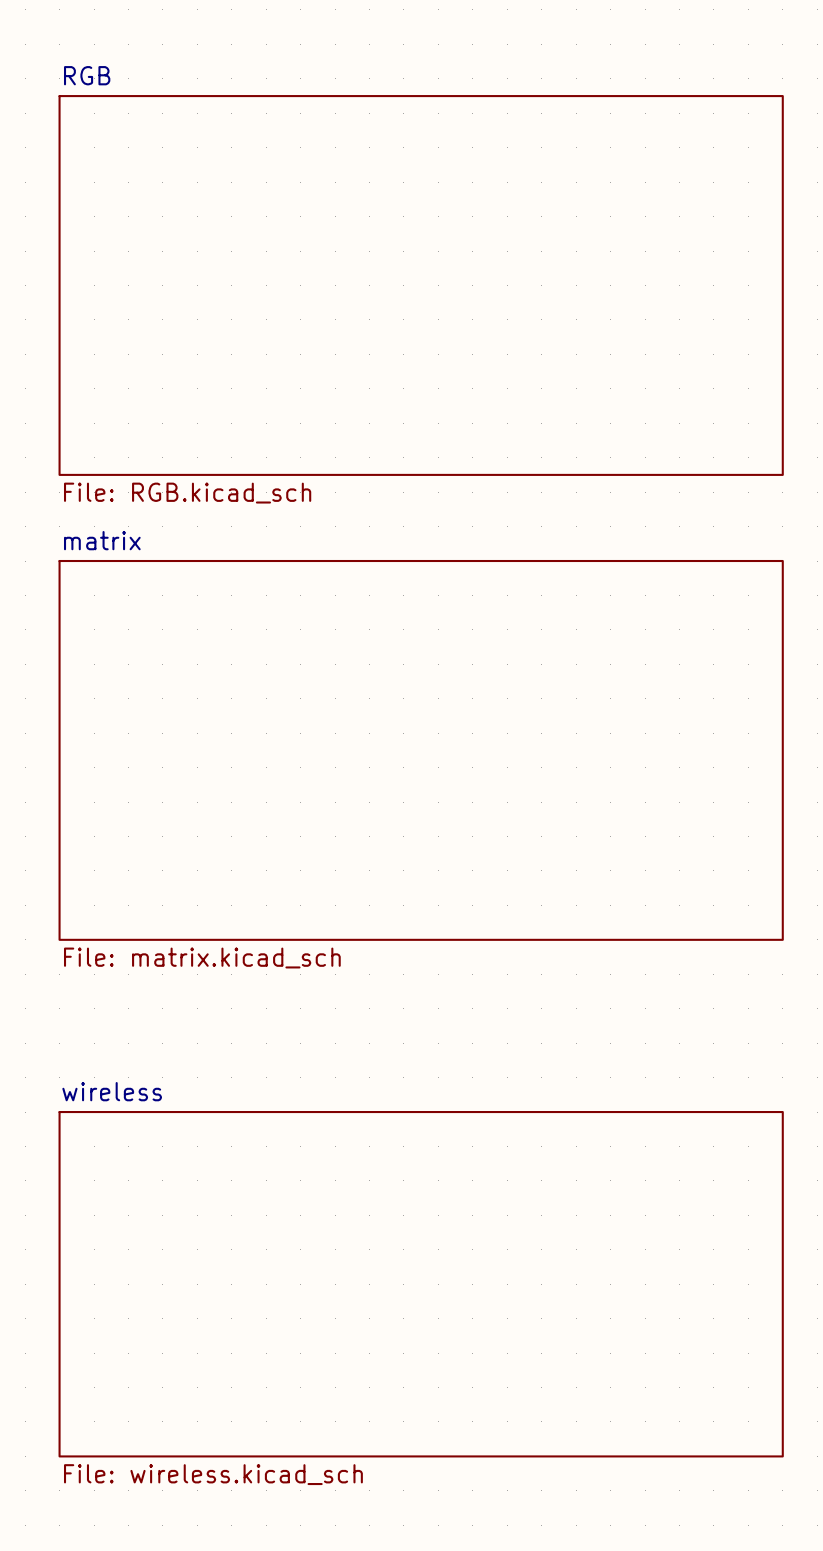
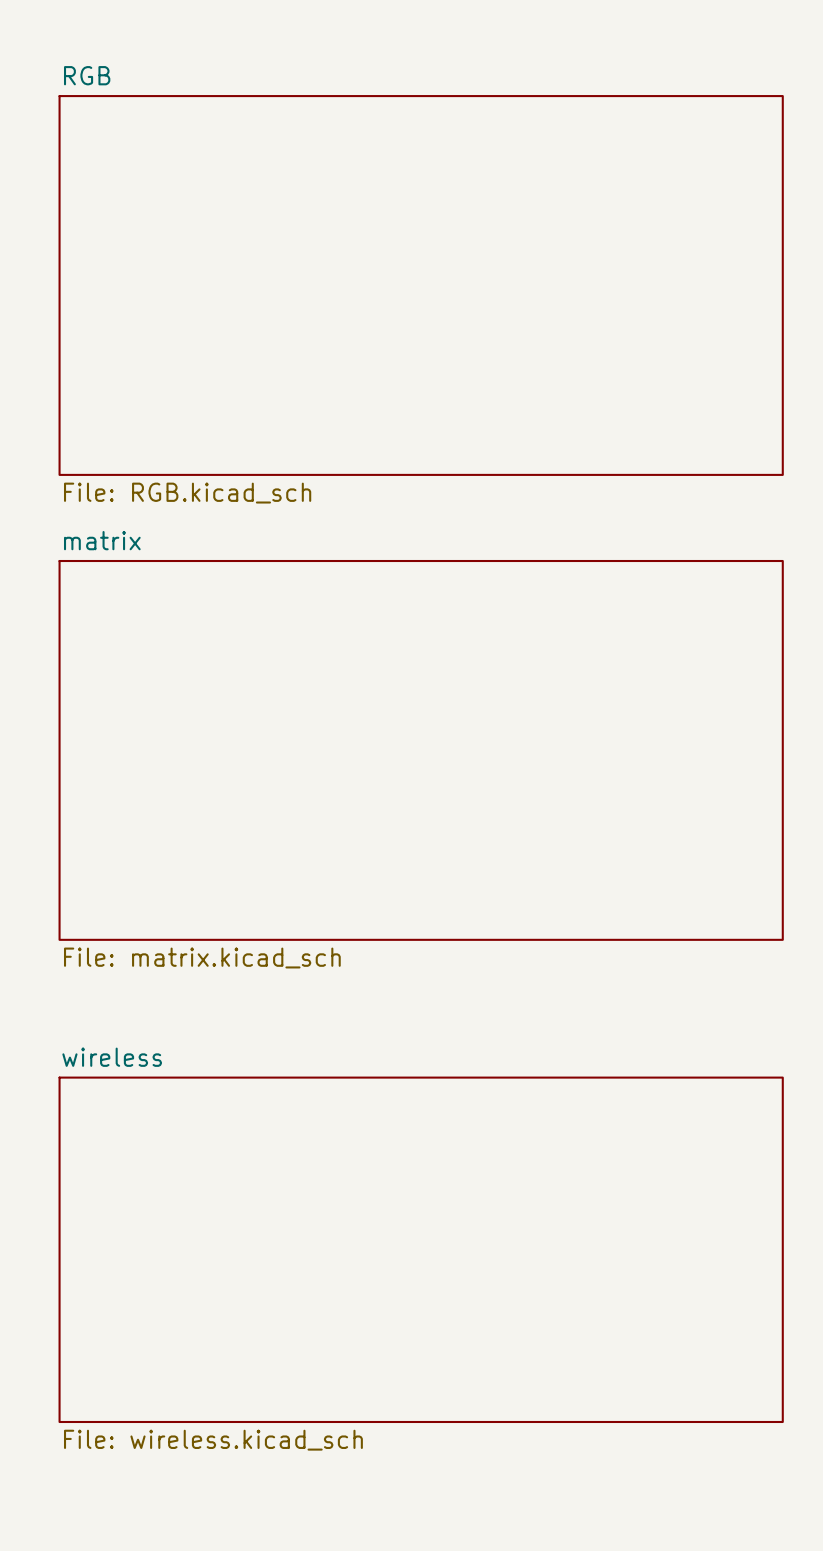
sheet wireless position: (421, 1284) -> (421, 1249)

